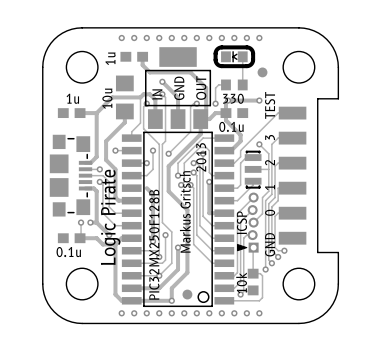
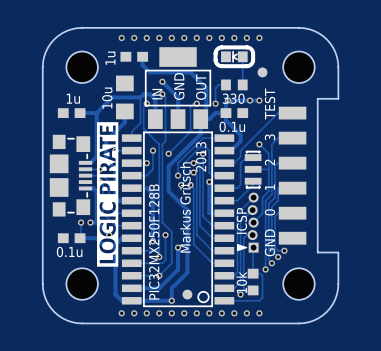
via: none -> (249, 100)
drawing: none -> [97, 122, 119, 267]
text: Logic Pirate (110, 217) -> none

